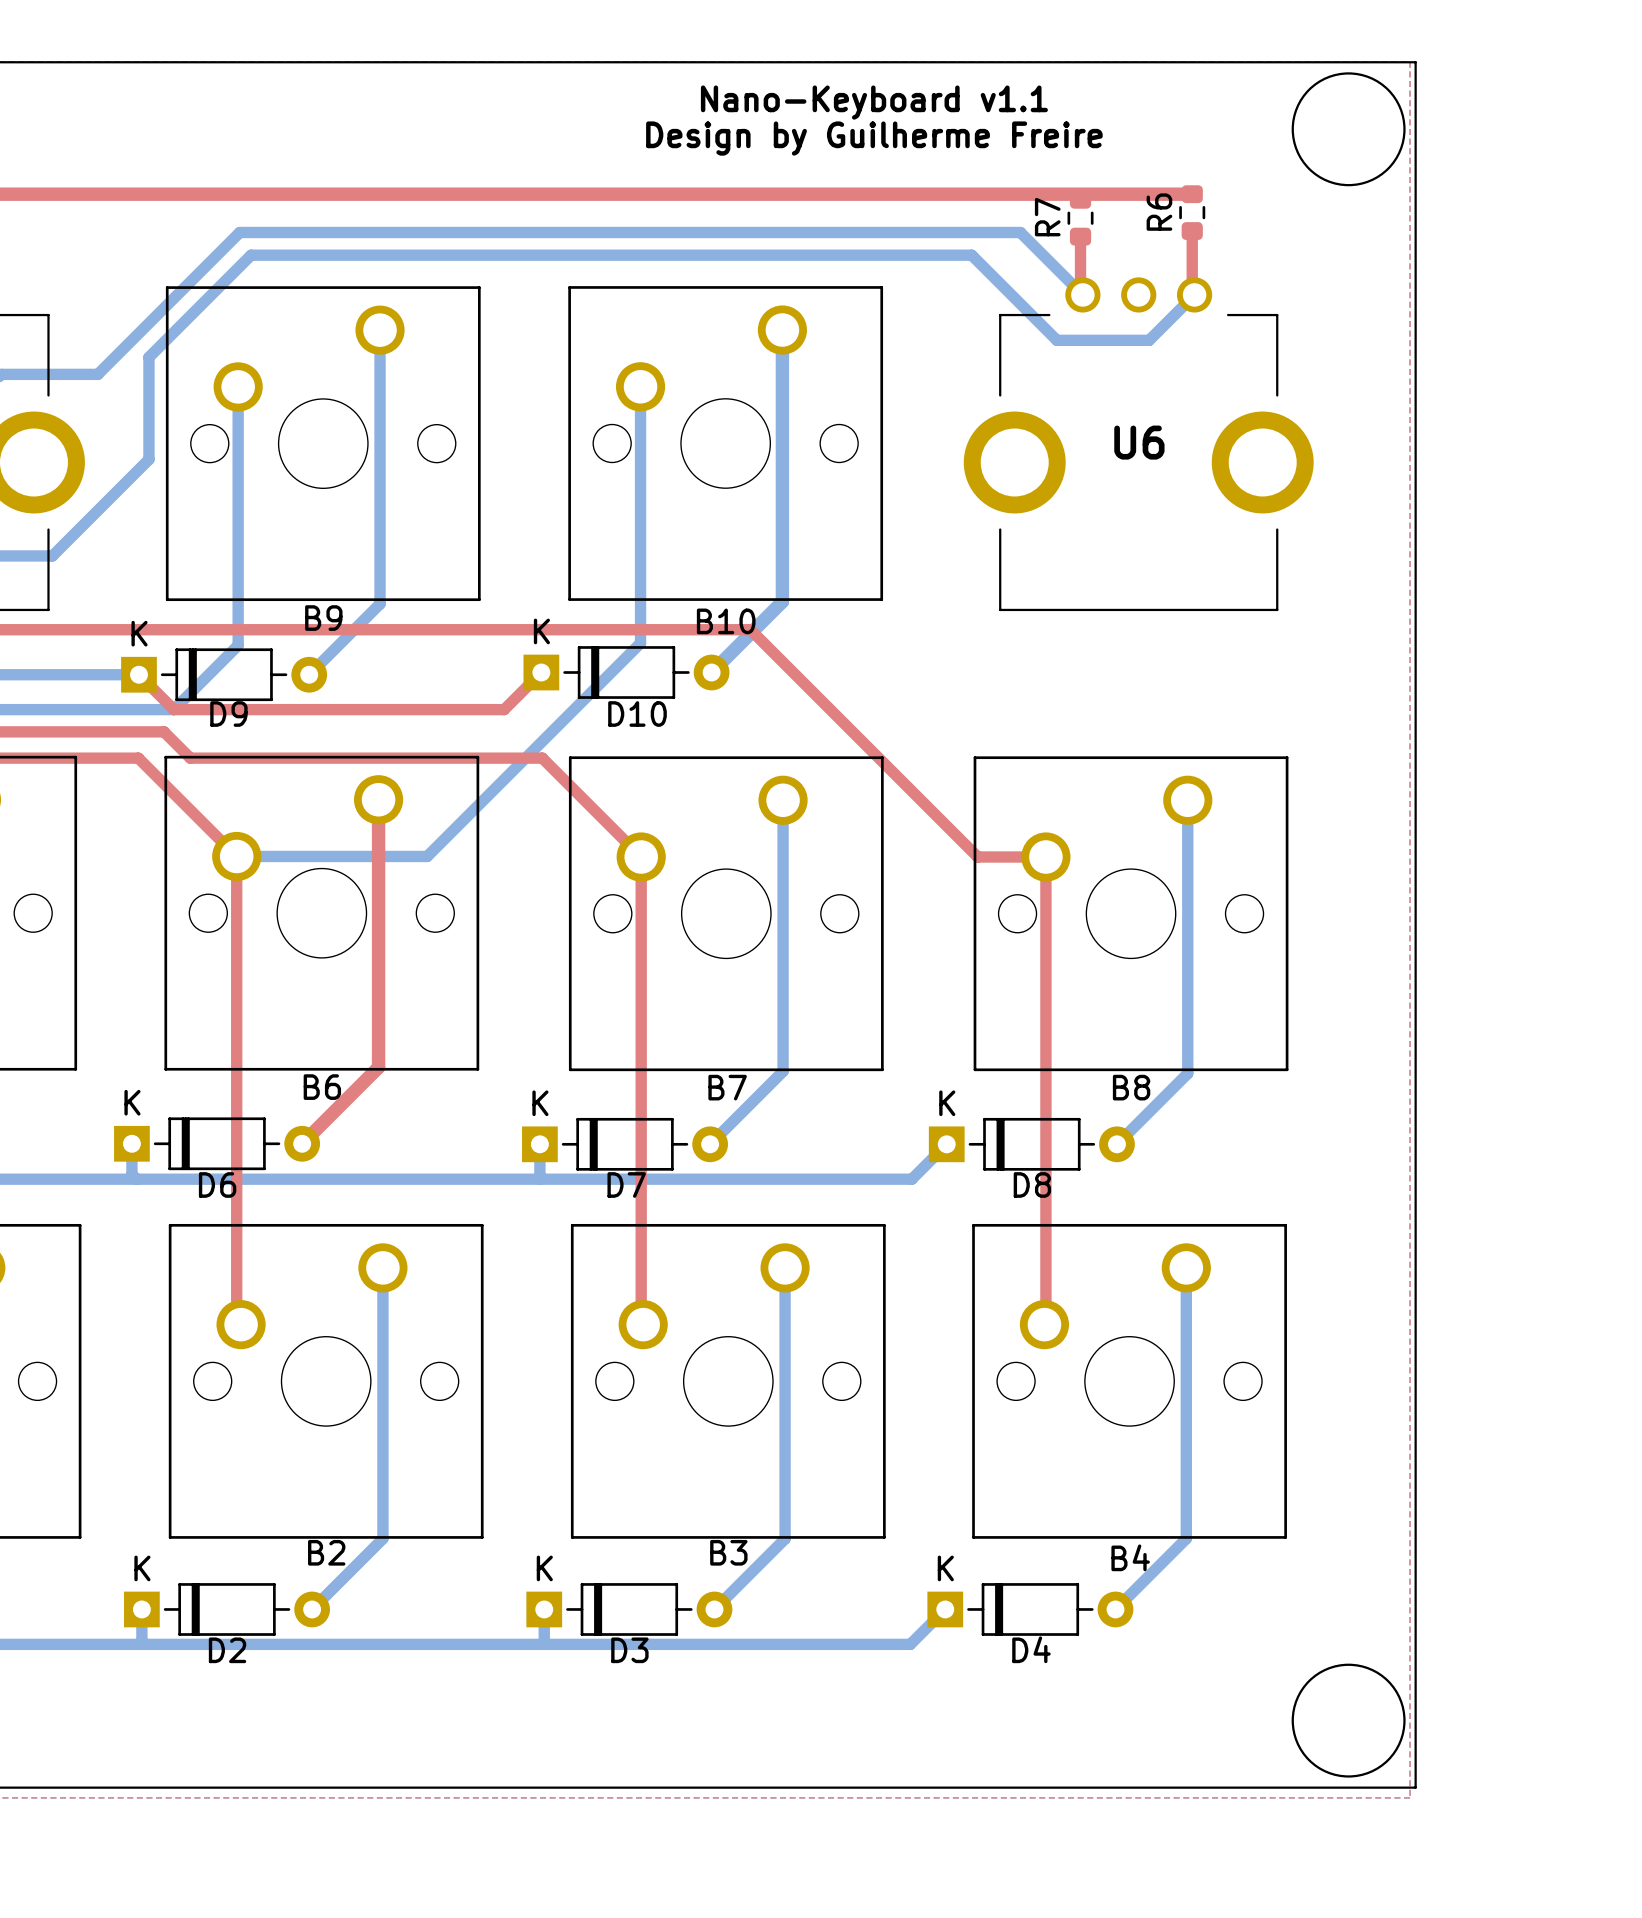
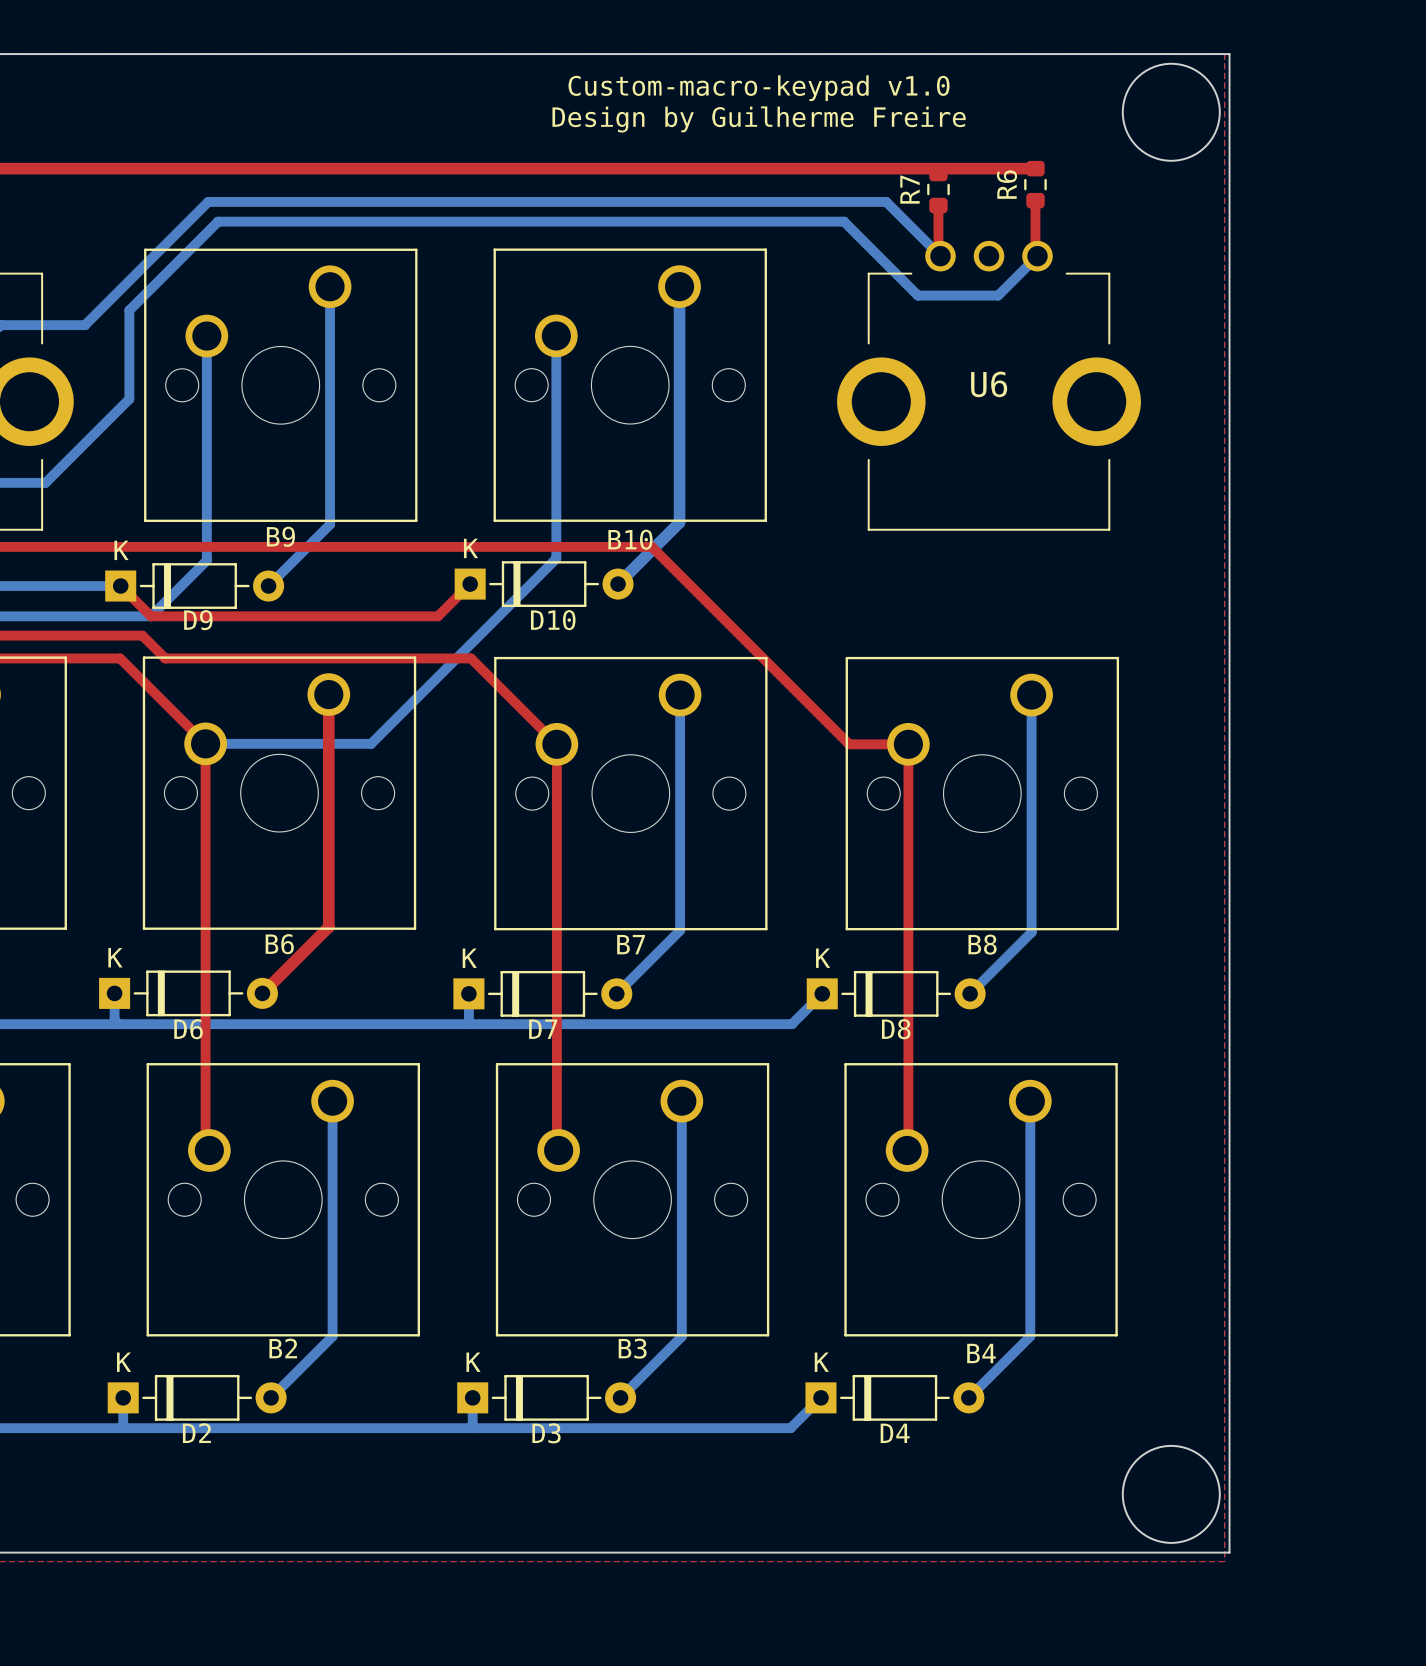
text: Nano-Keyboard v1.1 (874, 102) -> Custom-macro-keypad v1.0 (759, 88)

